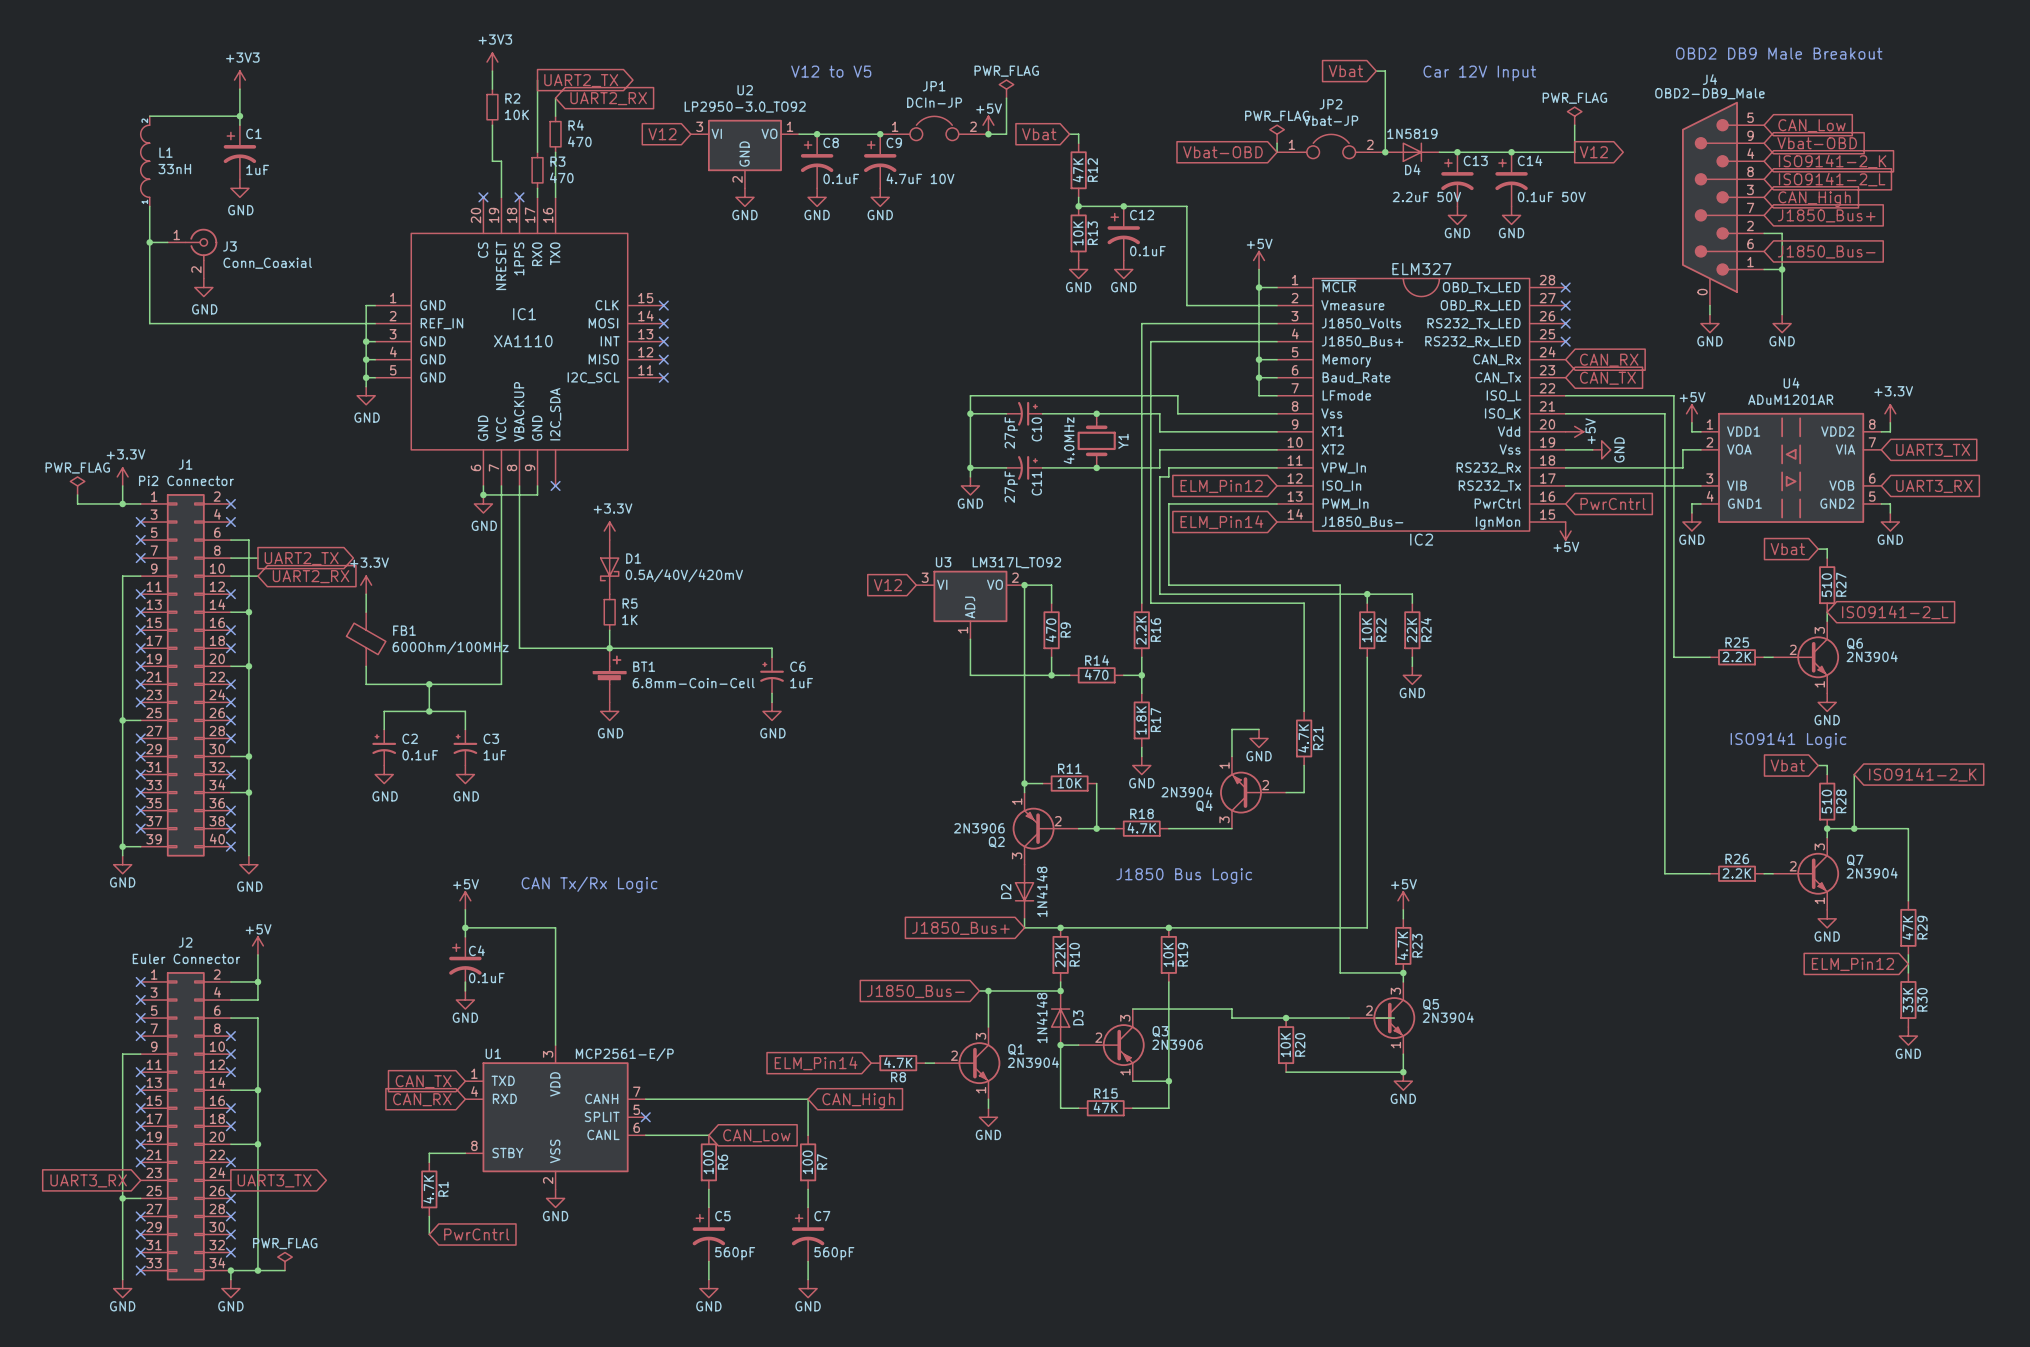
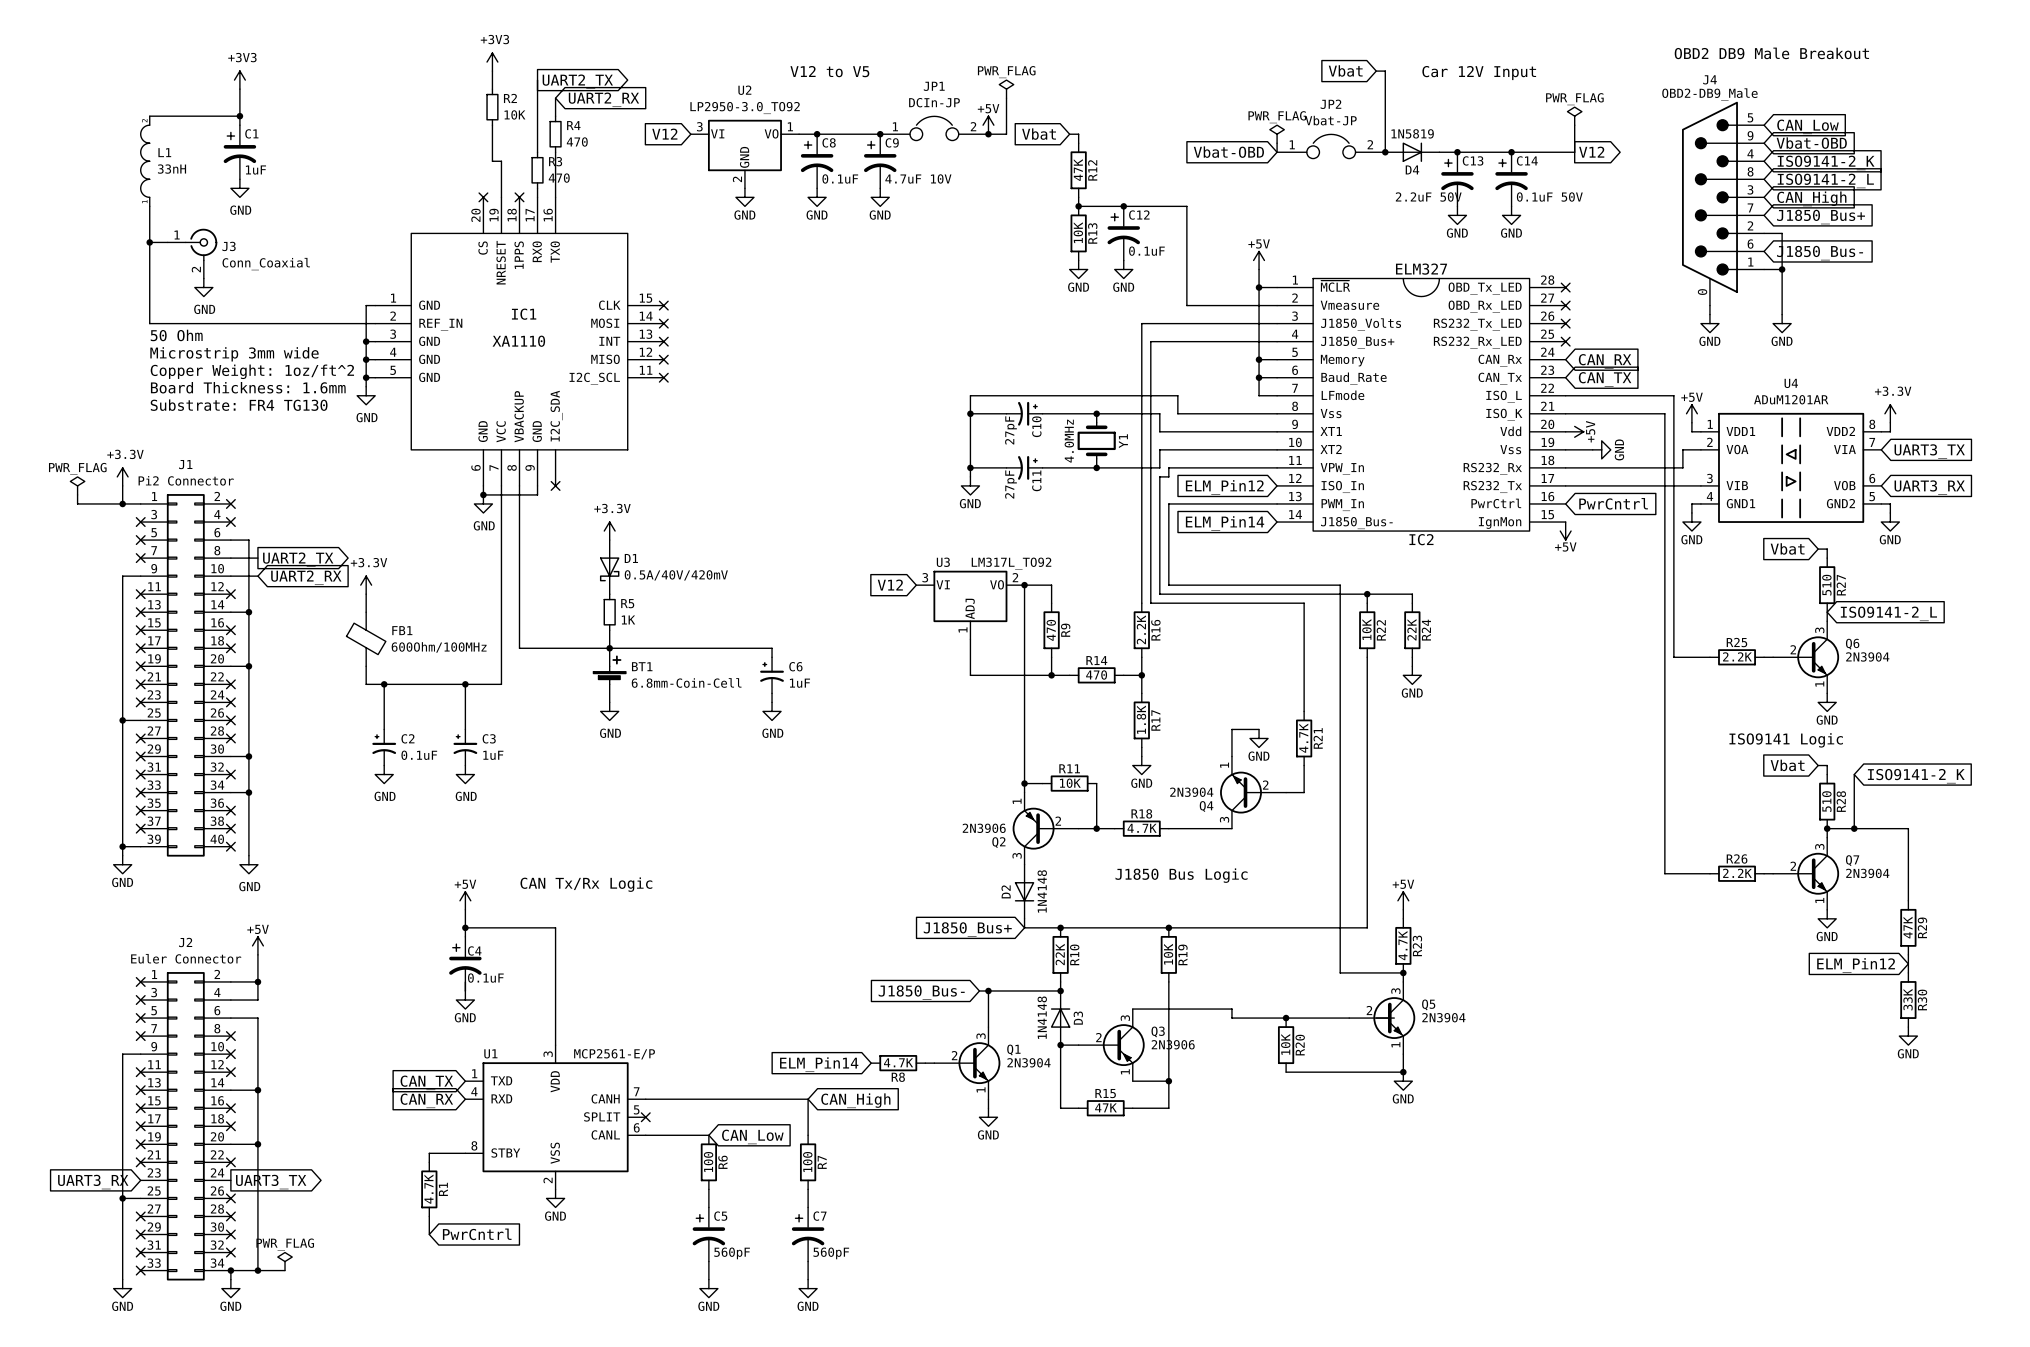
text: none -> 50 Ohm (176, 335)
text: none -> Microstrip 3mm wide (234, 354)
text: none -> Copper Weight: 1oz/ft^2 (252, 371)
text: none -> Board Thickness: 1.6mm (248, 387)
text: none -> Substrate: FR4 TG130 (239, 405)
junction: none -> (384, 684)
wire: (429, 684) (429, 711) -> (465, 684) (465, 711)
junction: (429, 684) -> none
junction: none -> (465, 684)
wire: (384, 711) (465, 711) -> (384, 711) (384, 684)
junction: (429, 711) -> none

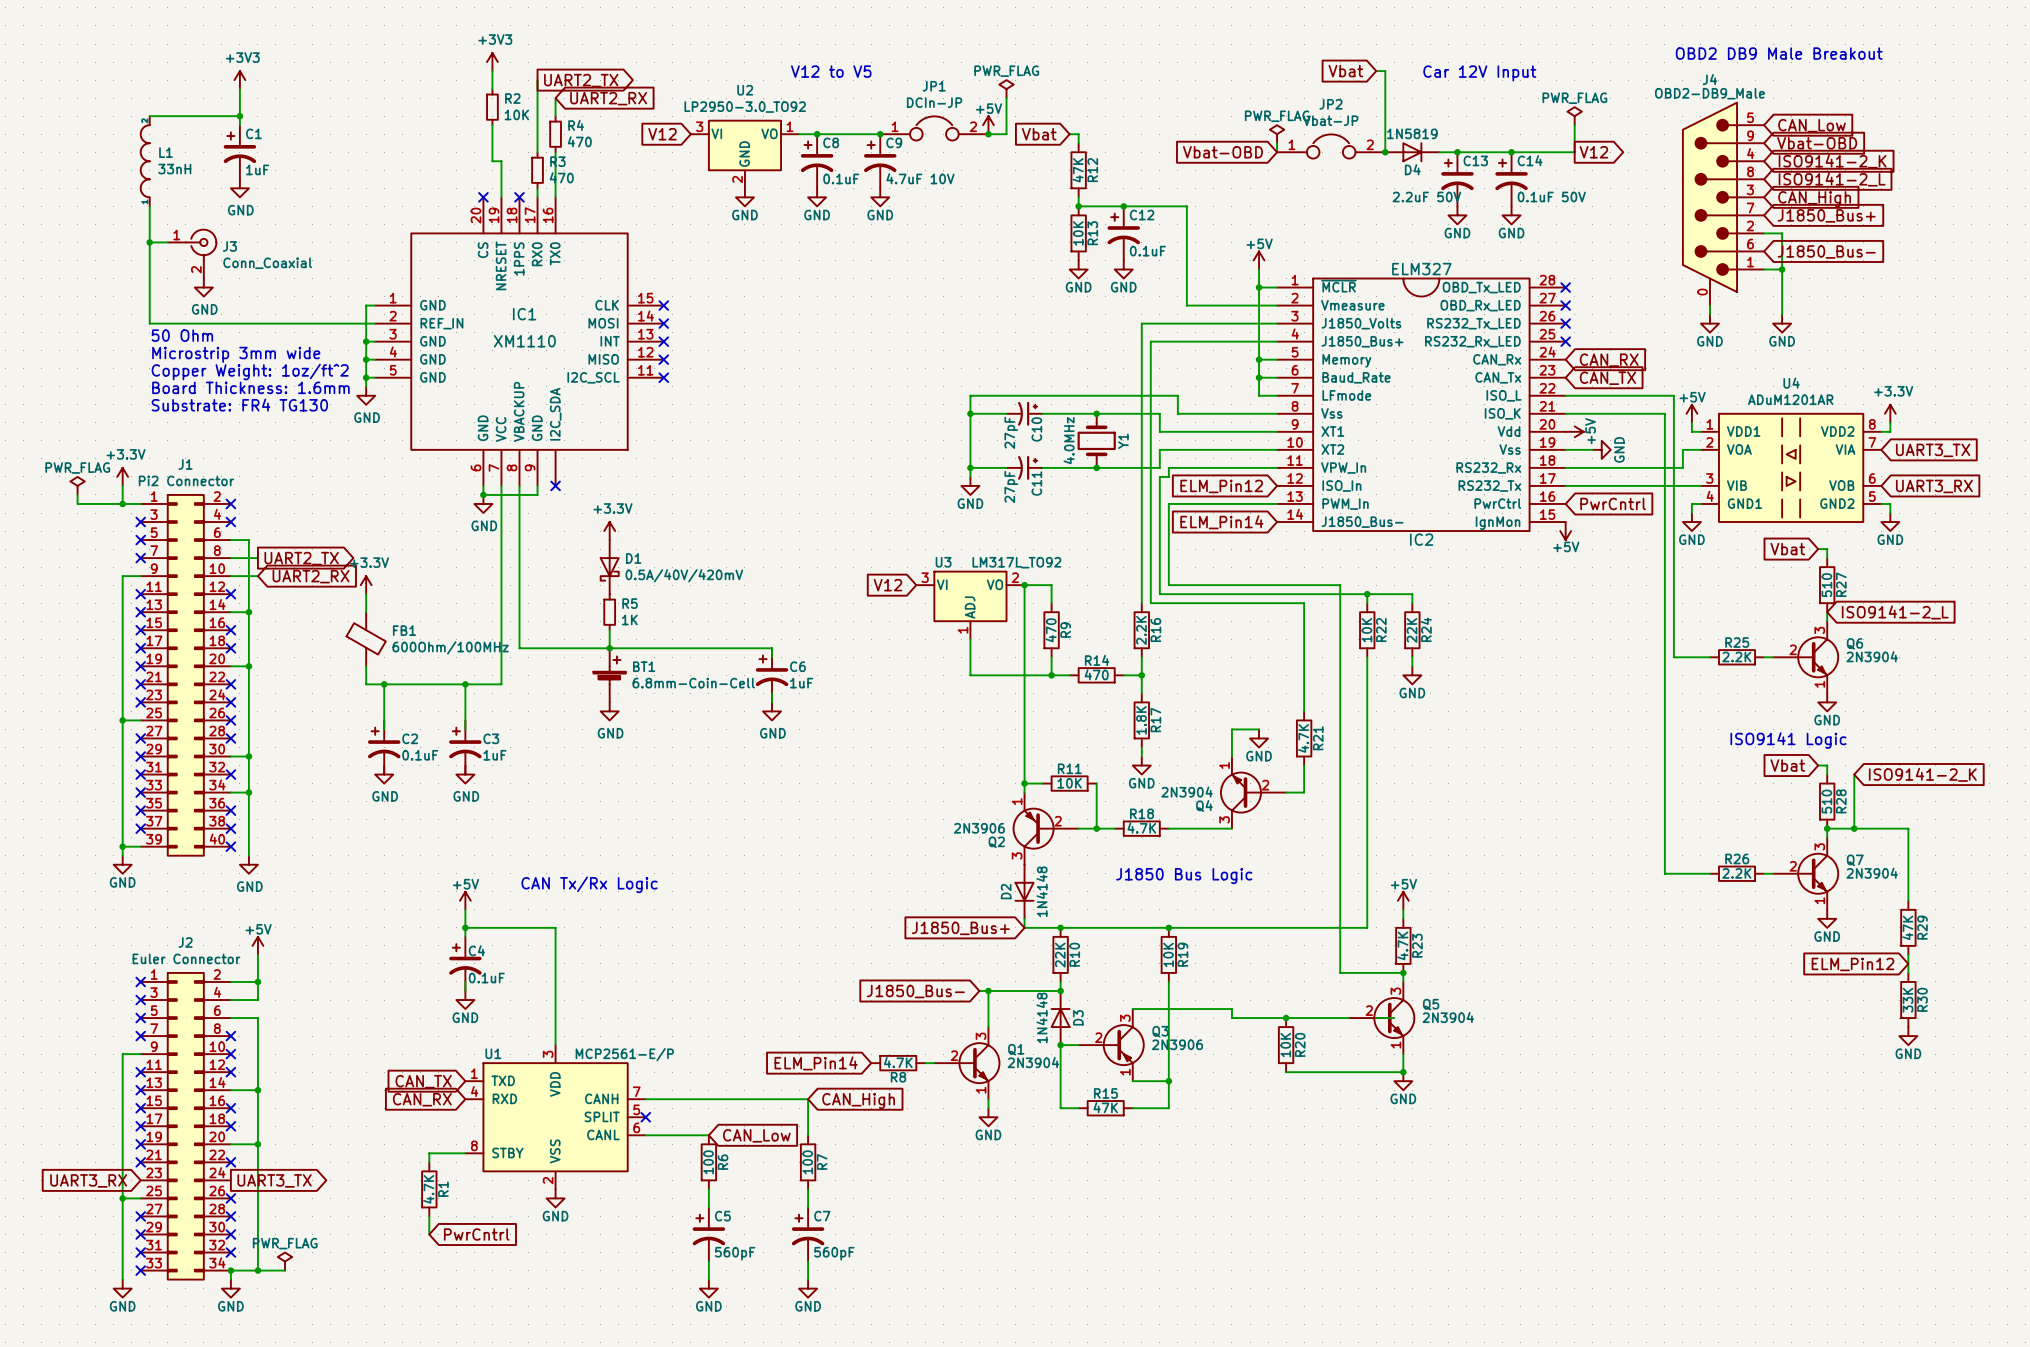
IC1 value: XA1110 (518, 341) -> XM1110 (524, 341)
C6 symbol: [760, 657, 784, 694] -> [755, 648, 789, 703]
C2 symbol: [372, 729, 397, 766] -> [367, 720, 401, 775]
C3 symbol: [453, 729, 478, 766] -> [449, 720, 482, 775]

